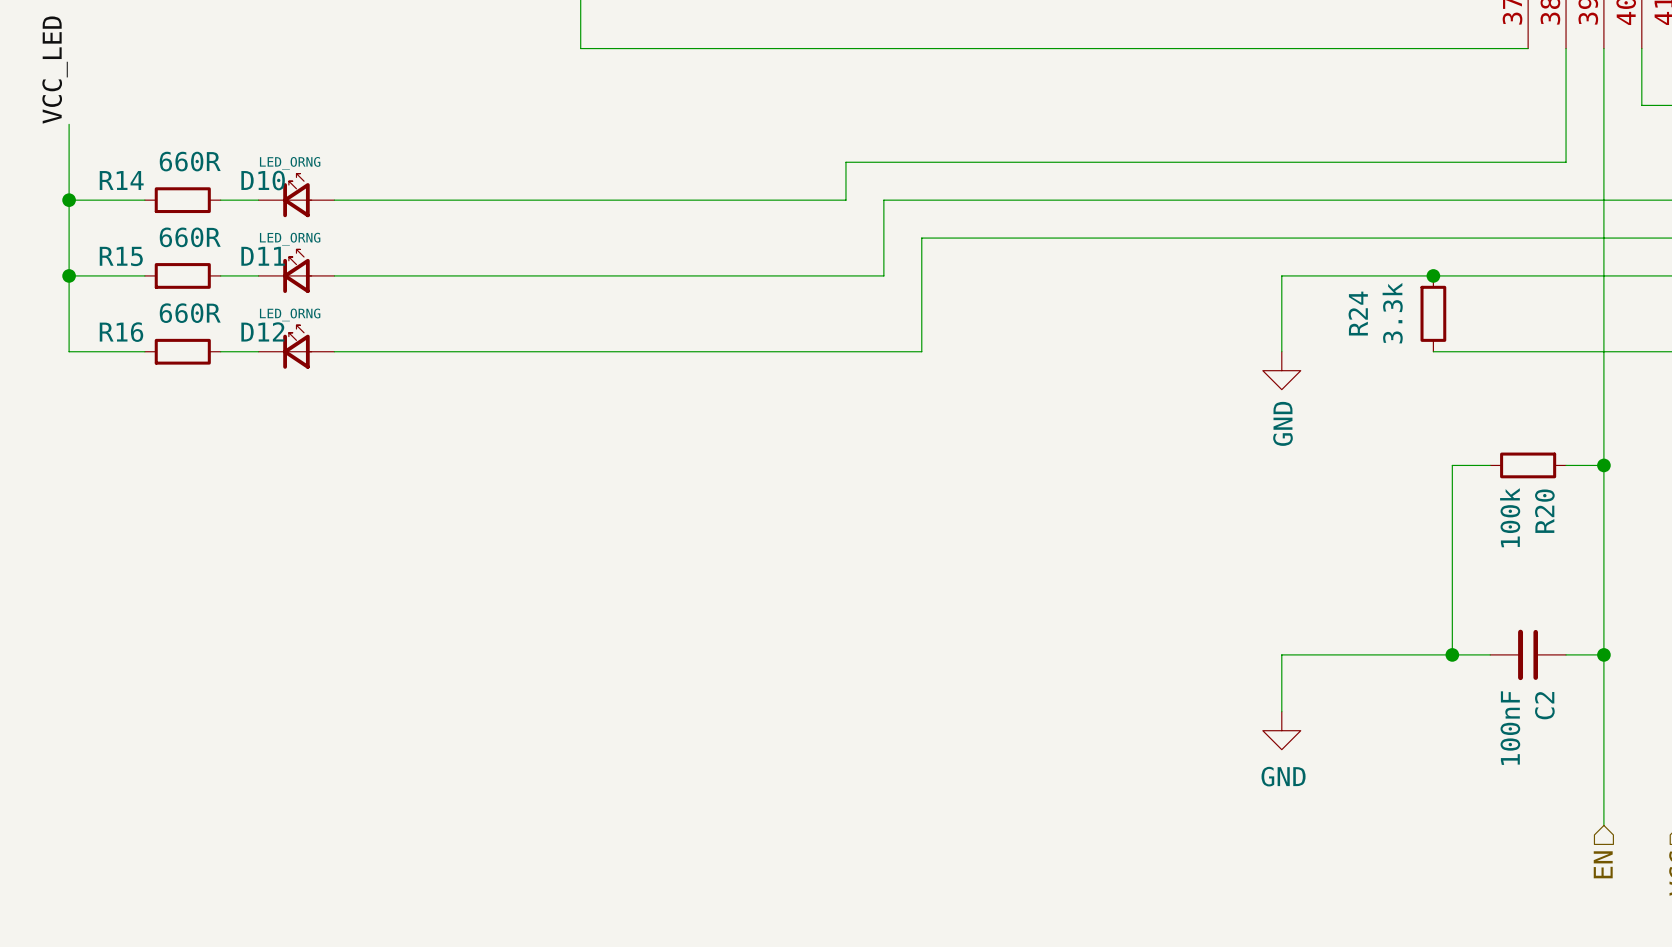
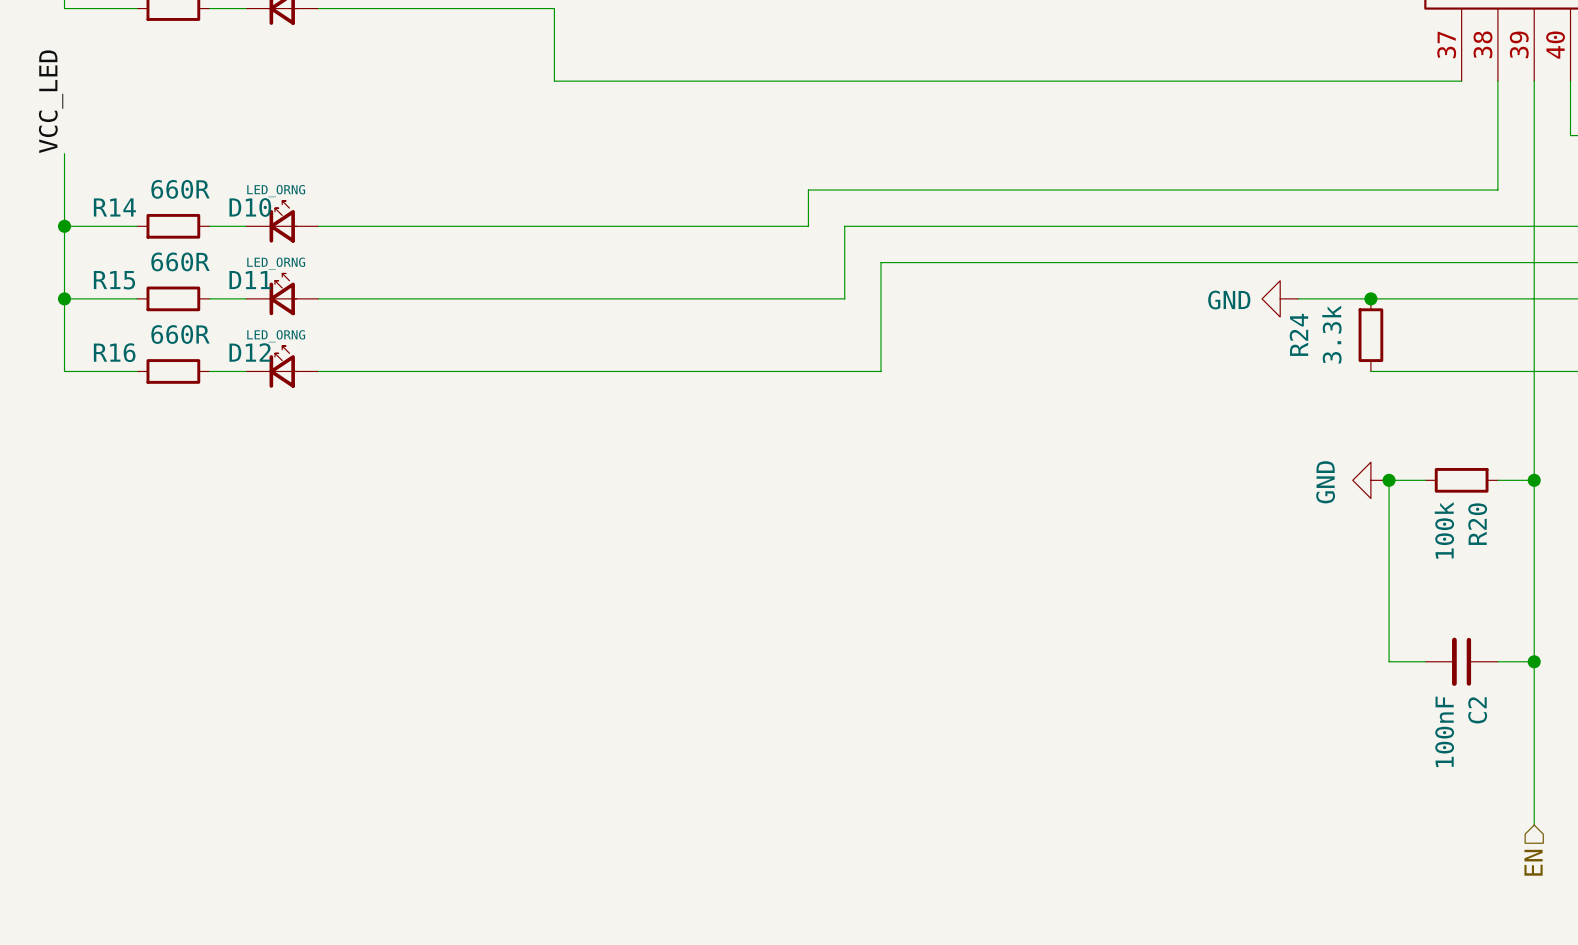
power symbol: none -> GND (1280, 298)
wire: (1357, 275) (1281, 275) (1281, 351) -> none
power symbol: GND (1281, 370) -> none
power symbol: none -> GND (1370, 480)
junction: none -> (1389, 480)
wire: (1452, 654) (1281, 654) (1281, 711) -> none
junction: (1452, 654) -> none
power symbol: GND (1281, 730) -> none

